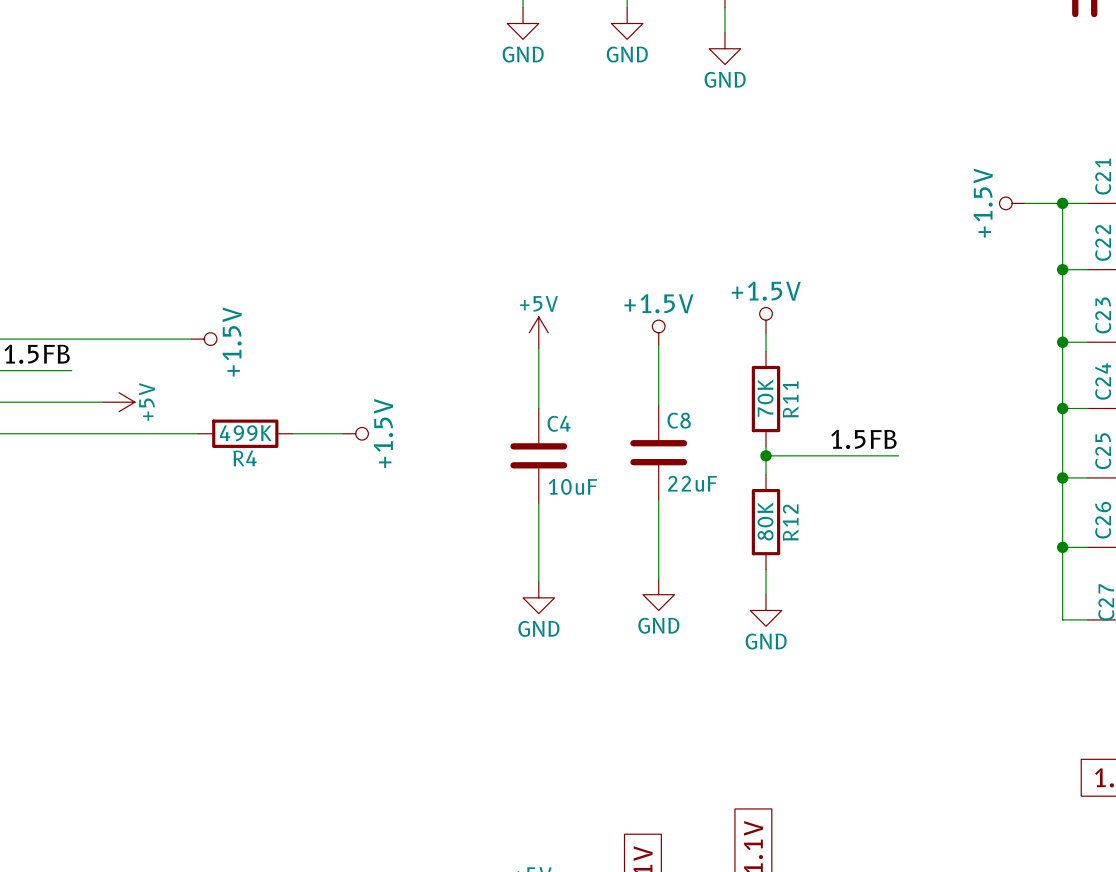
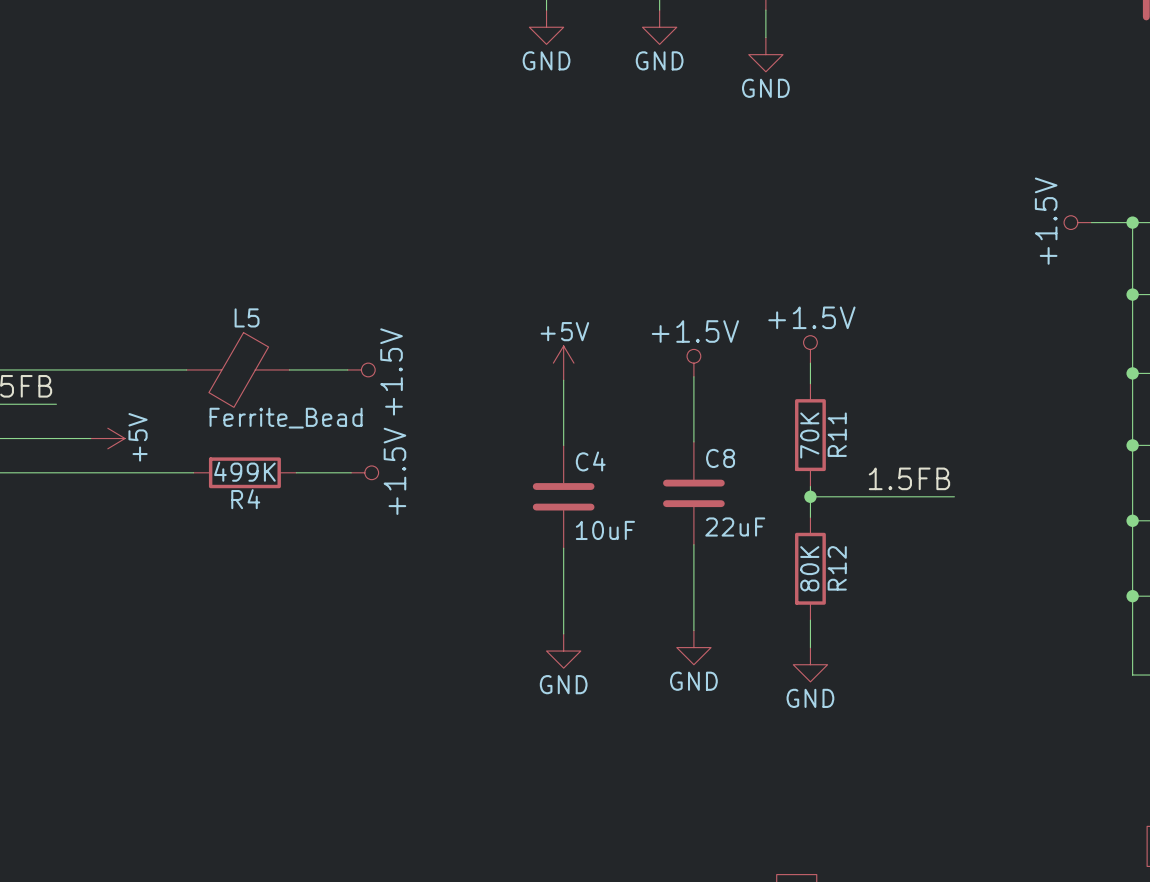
power symbol position: +1.5V (204, 339) -> +1.5V (361, 369)
L5: none -> Ferrite_Bead (238, 369)
wire: none -> (289, 369) (347, 369)

